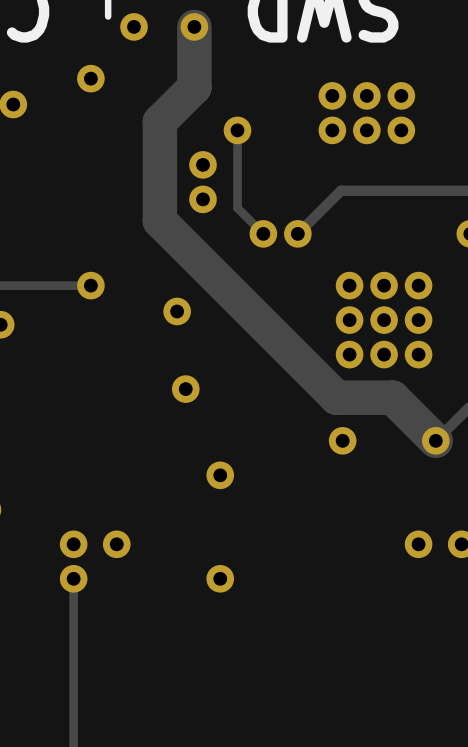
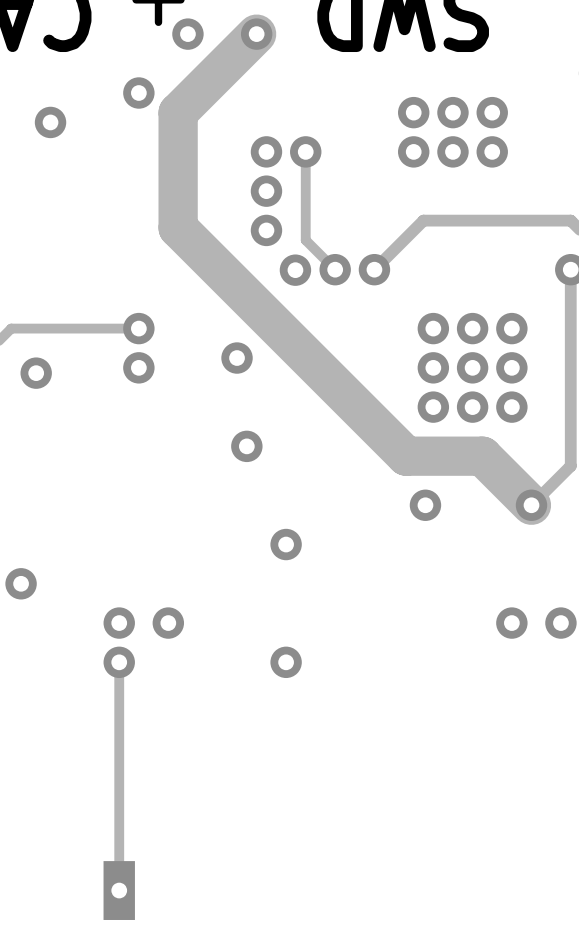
track: (194, 26) (194, 87) (159, 121) (159, 220) (336, 397) -> (256, 34) (178, 112) (178, 227) (406, 456) (418, 456)
via: none -> (266, 151)
via: none -> (295, 270)
via: none -> (138, 367)

